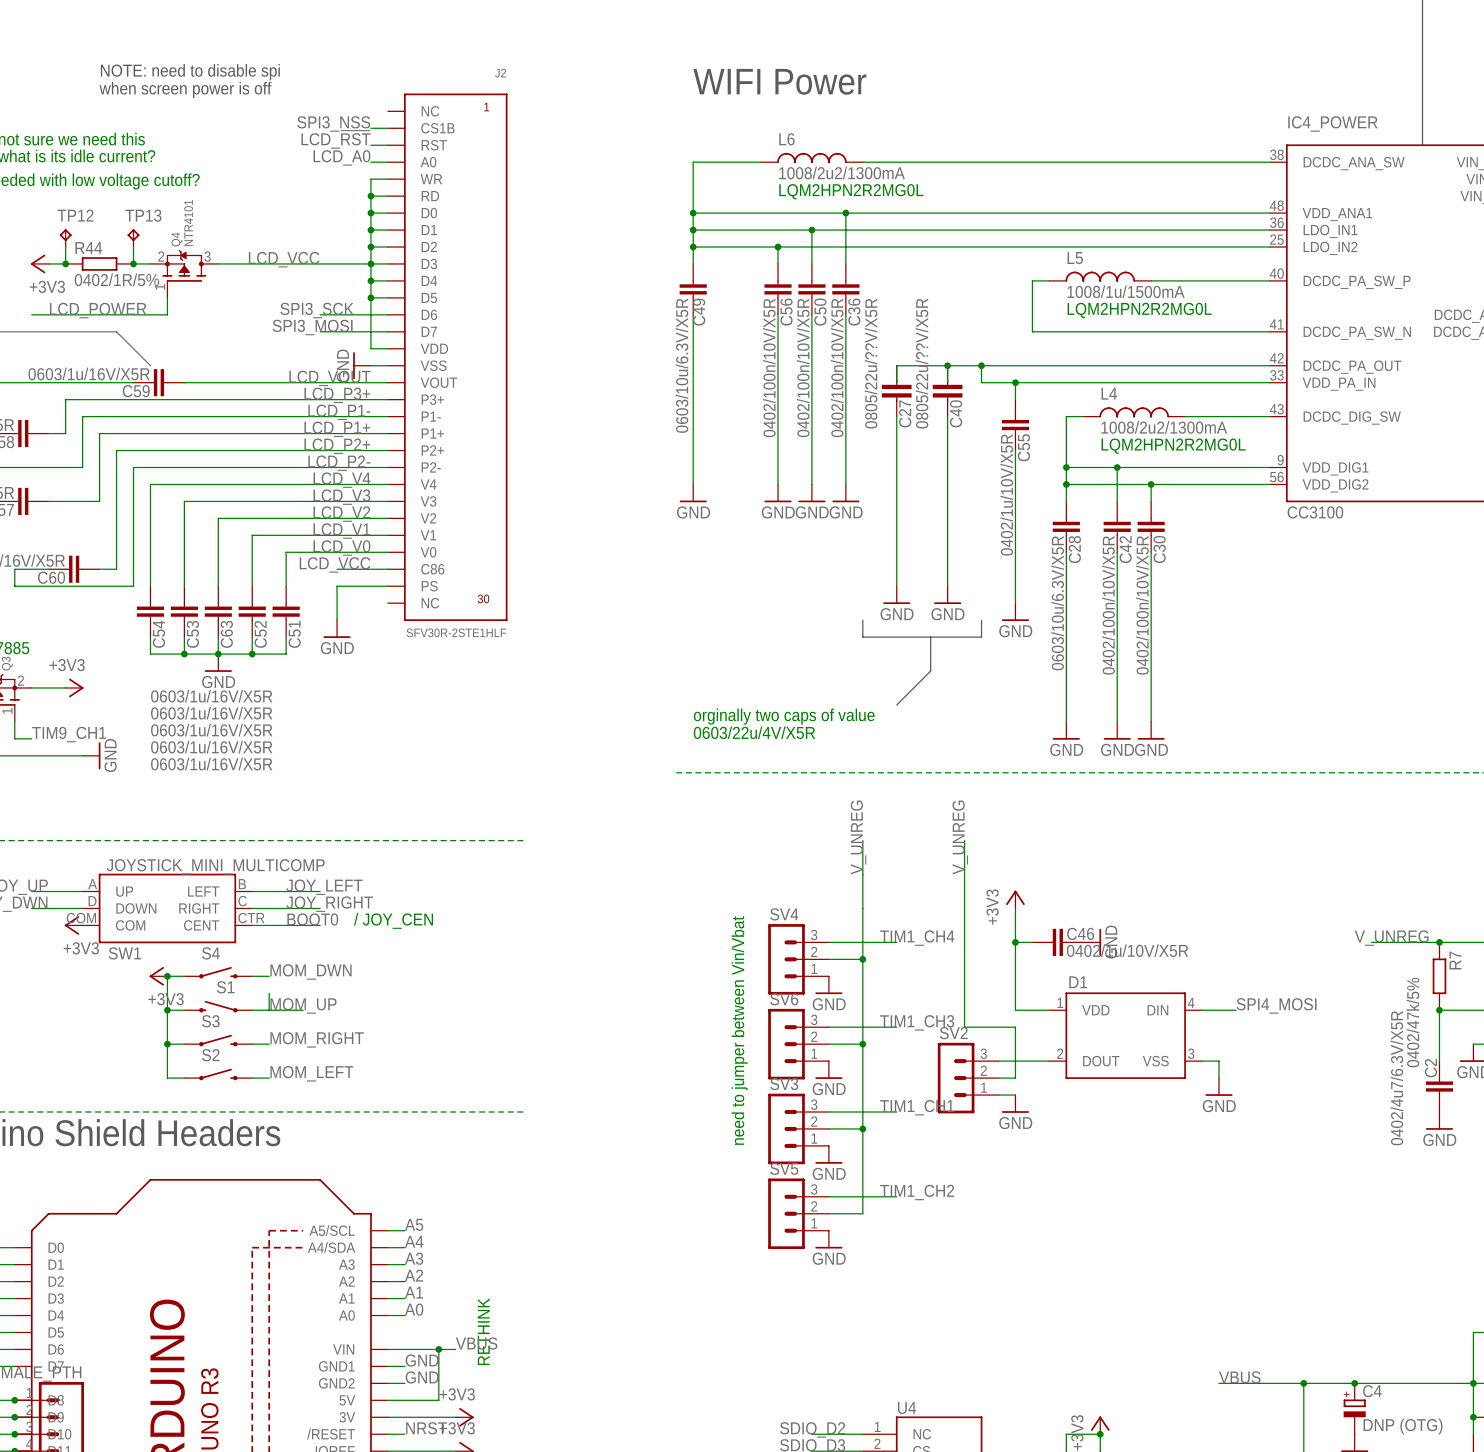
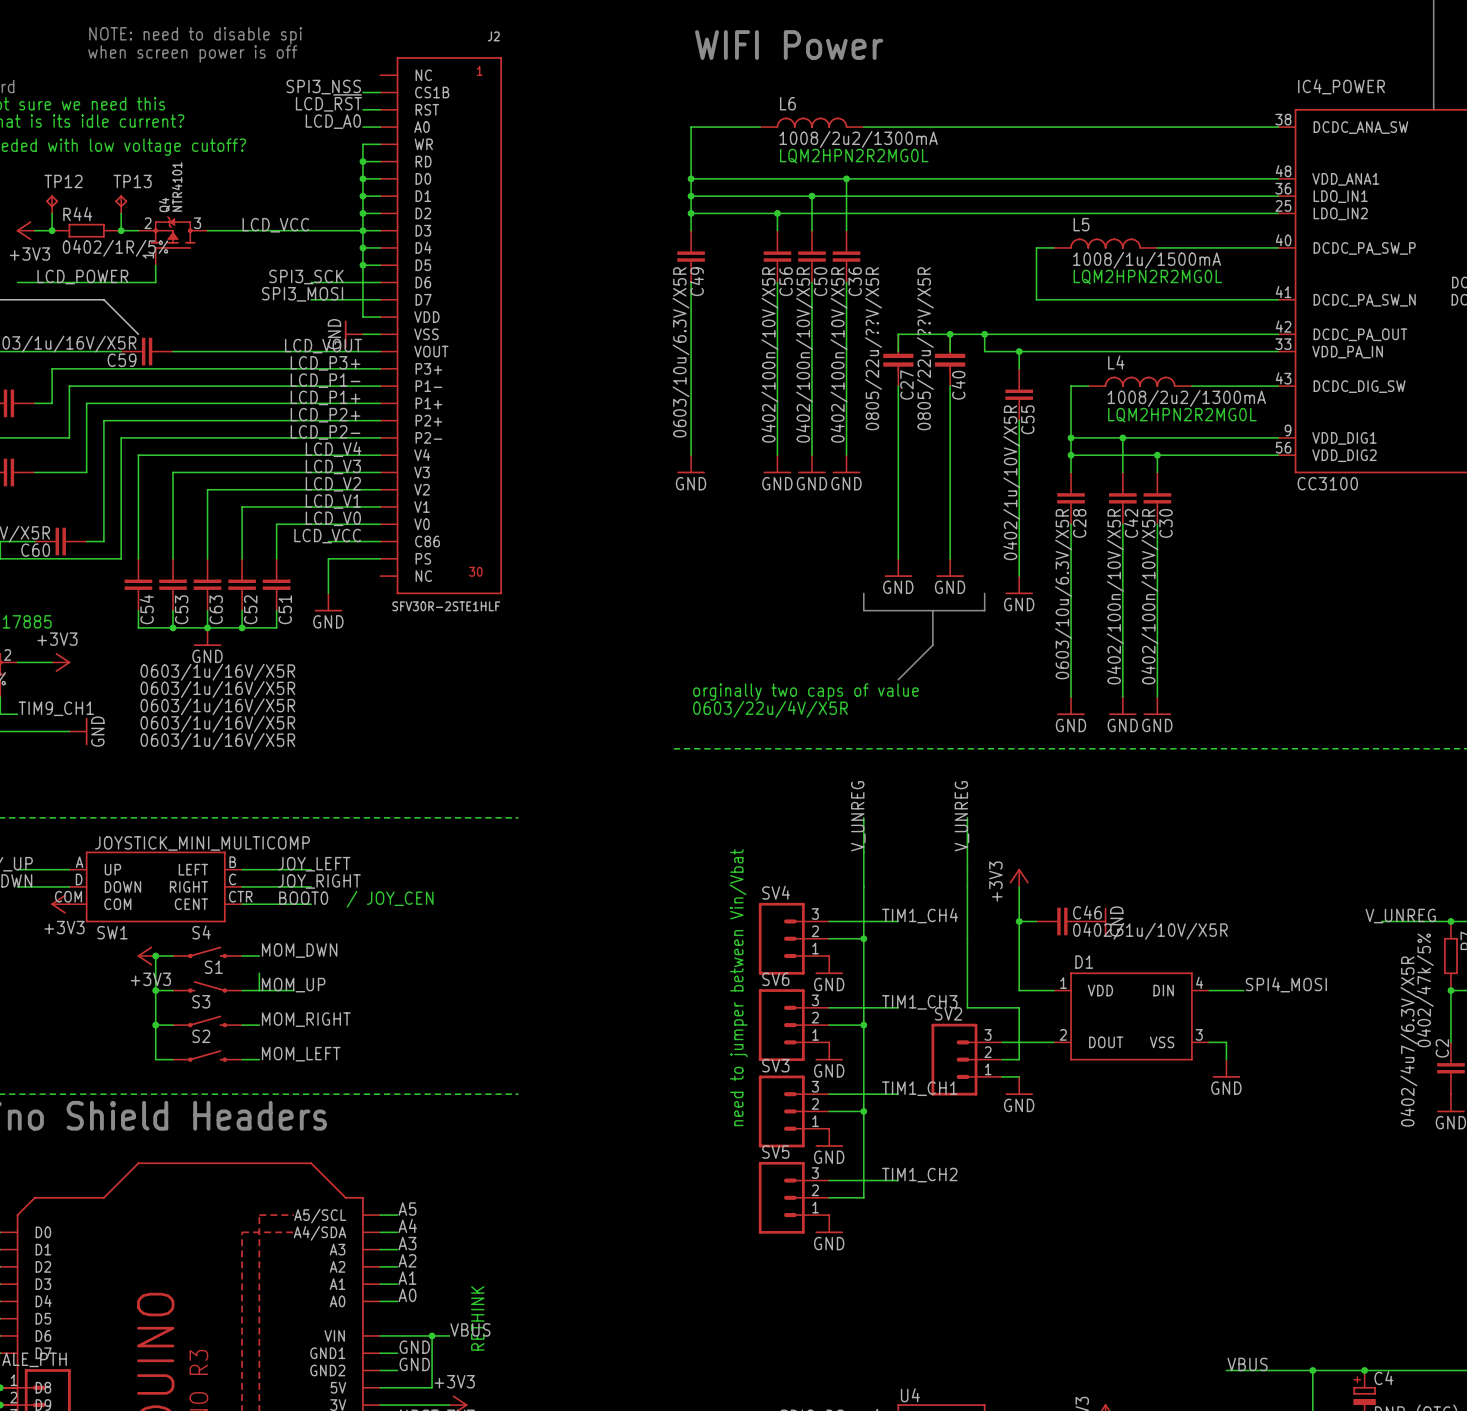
SV4 symbol: [768, 924, 829, 995] -> [758, 902, 830, 975]
SV6 symbol: [768, 1008, 829, 1080] -> [758, 989, 830, 1062]
SV2 symbol: [937, 1042, 999, 1114] -> [931, 1023, 1002, 1096]
SV3 symbol: [768, 1093, 829, 1165] -> [758, 1075, 830, 1148]
SV5 symbol: [768, 1178, 829, 1250] -> [758, 1161, 830, 1234]

